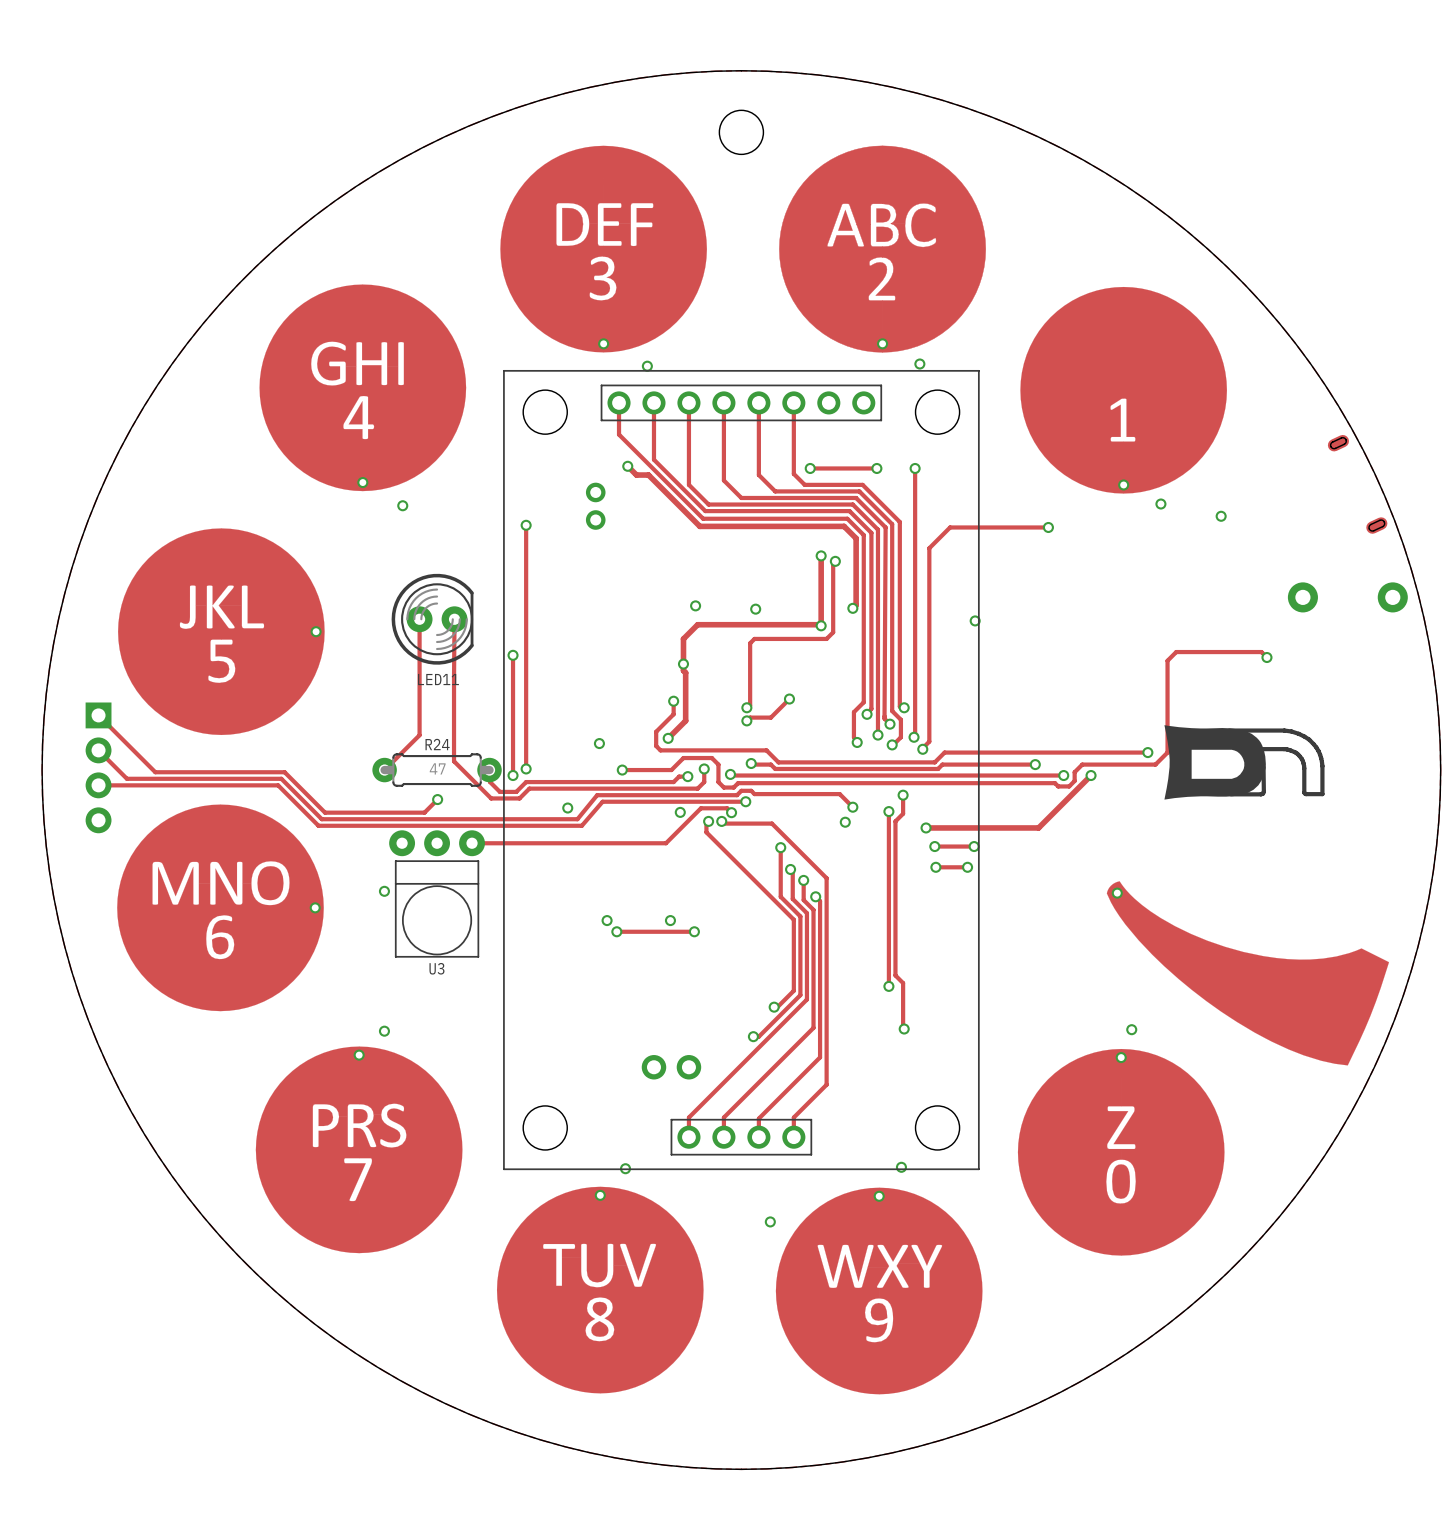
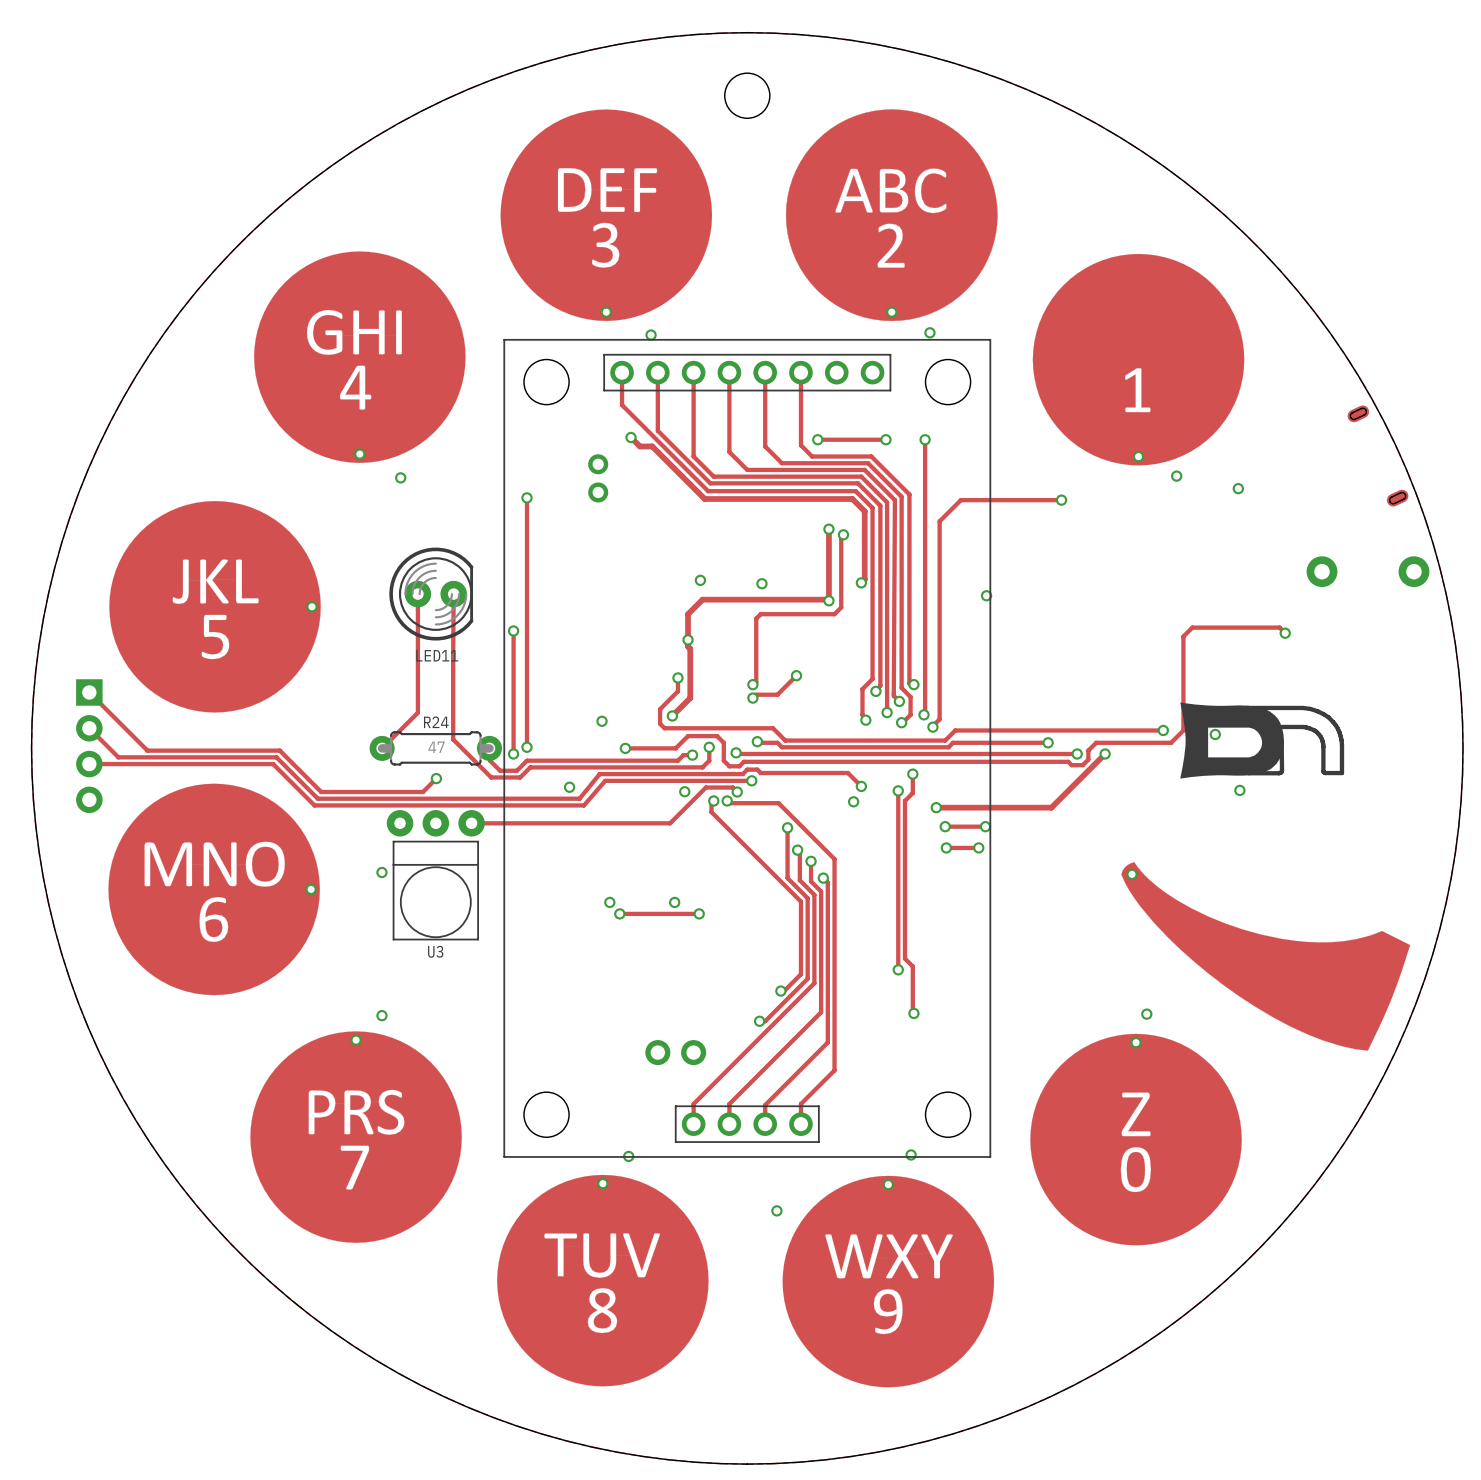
via: none -> (1215, 734)
via: none -> (1239, 790)

